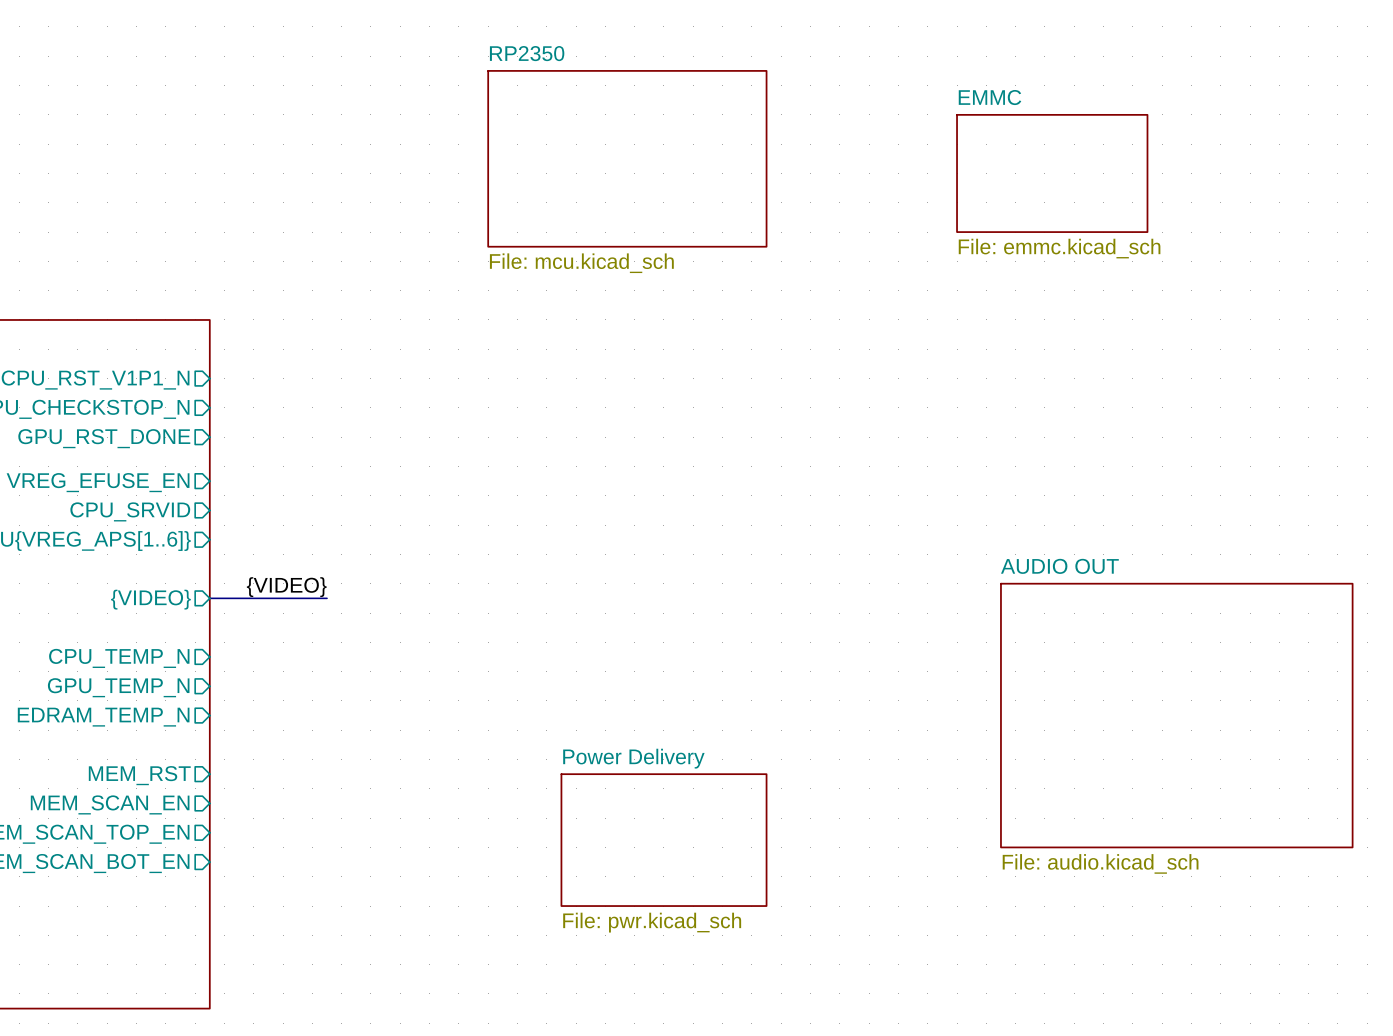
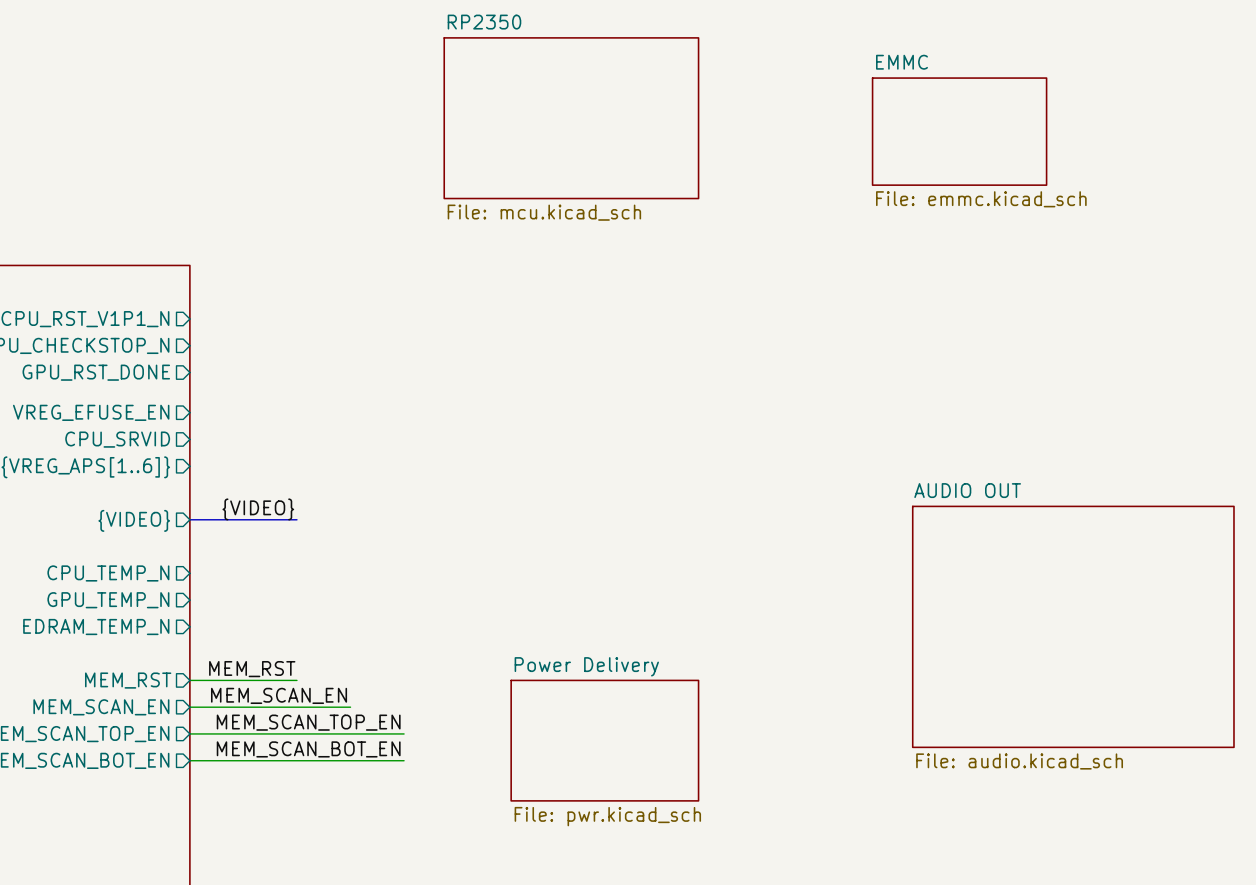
label: none -> MEM_RST (252, 669)
wire: none -> (189, 680) (296, 680)
label: none -> MEM_SCAN_EN (279, 695)
wire: none -> (189, 707) (350, 707)
label: none -> MEM_SCAN_TOP_EN (308, 722)
wire: none -> (189, 733) (404, 733)
label: none -> MEM_SCAN_BOT_EN (308, 749)
wire: none -> (189, 760) (404, 760)

